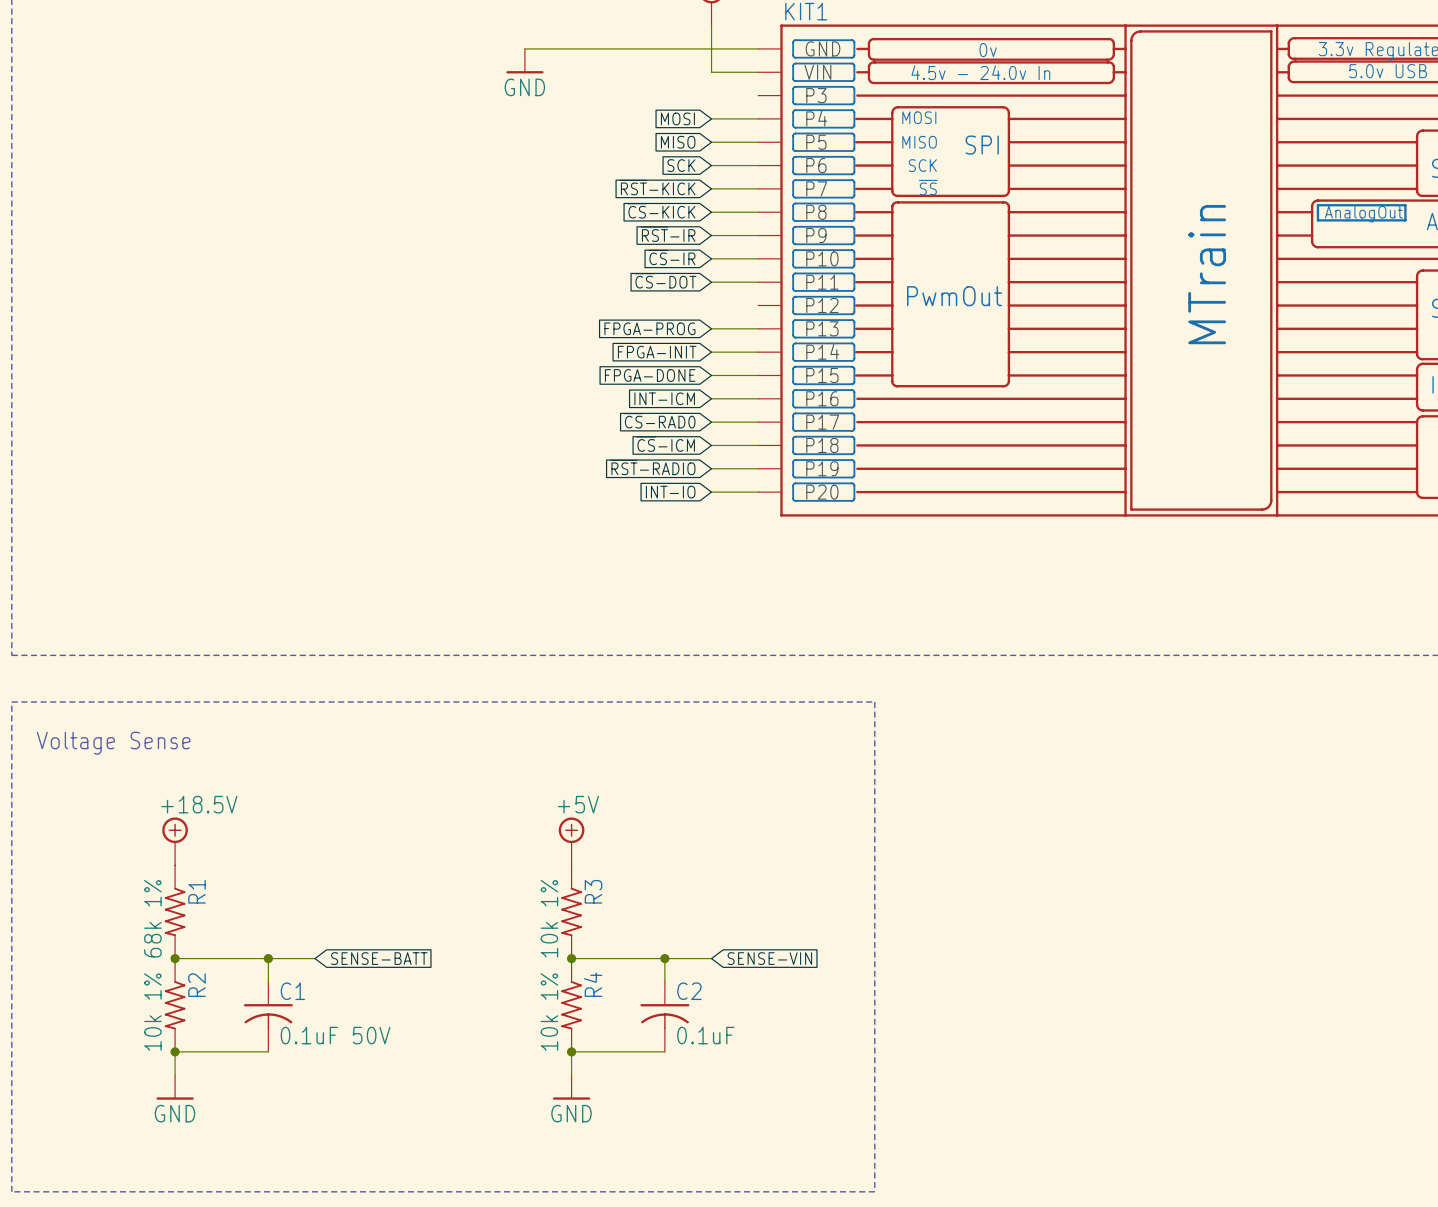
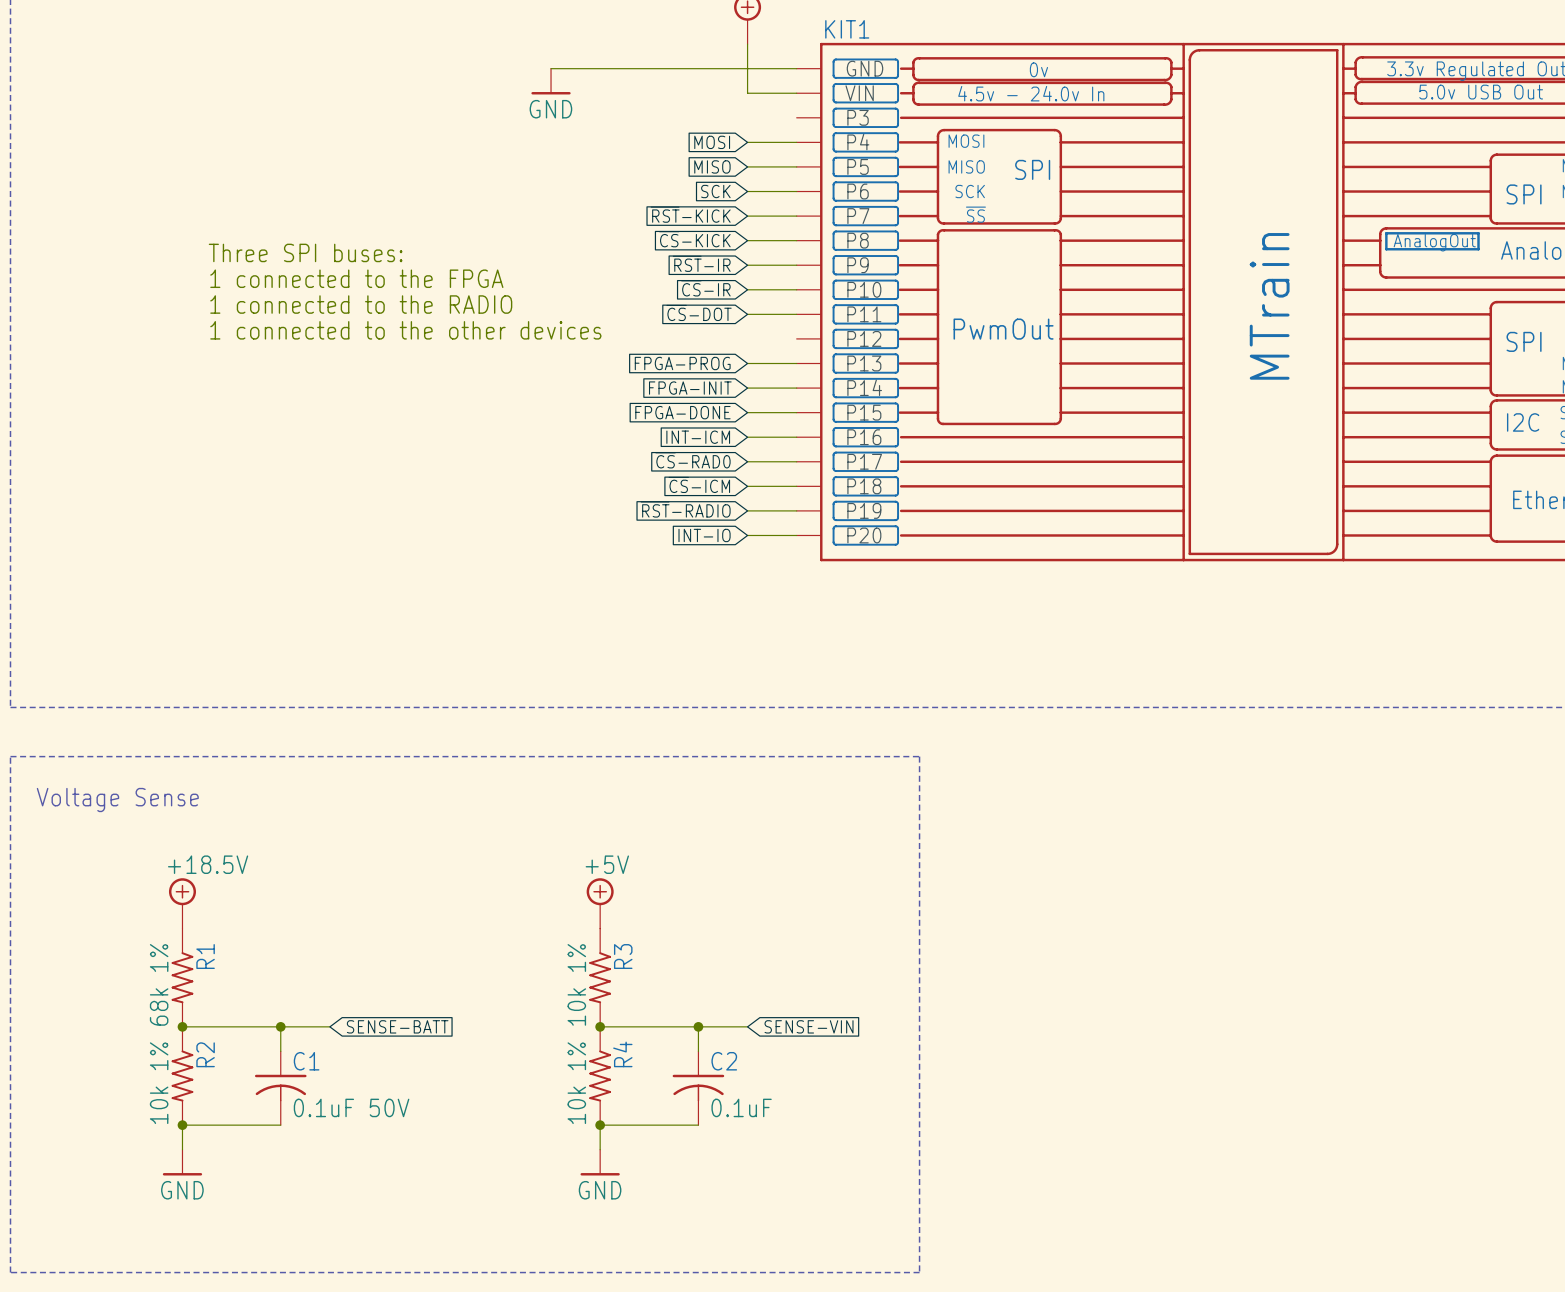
text: none -> Three SPI buses: (305, 252)
text: none -> 1 connected to the FPGA (356, 278)
text: none -> 1 connected to the RADIO (361, 304)
text: none -> 1 connected to the other devices (405, 330)

